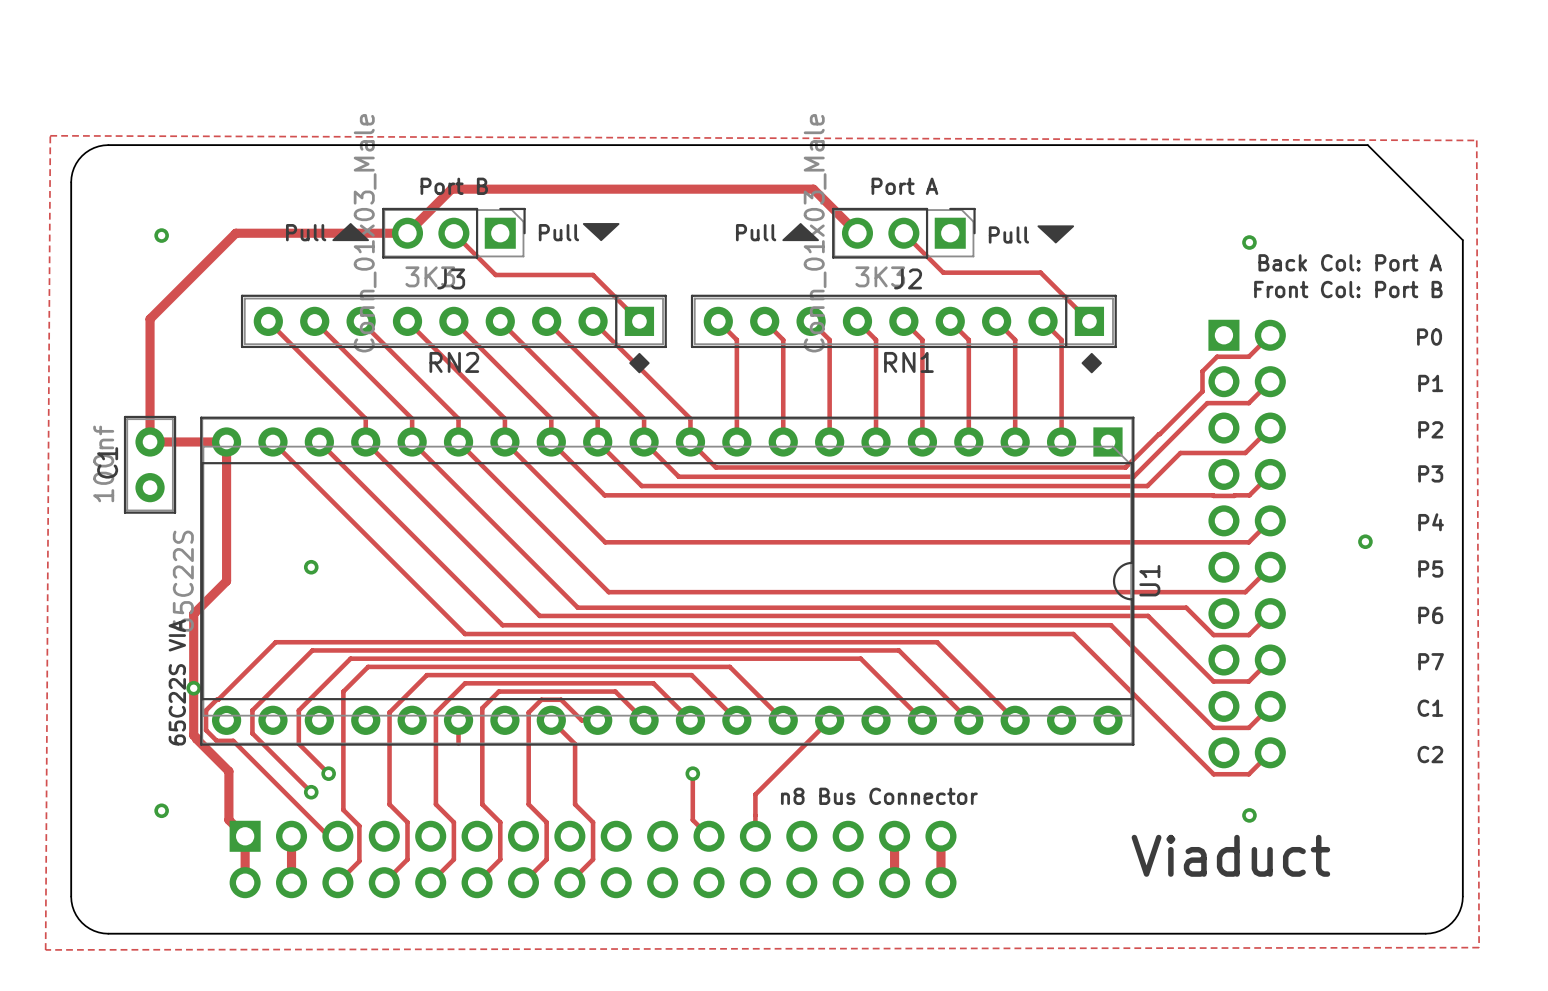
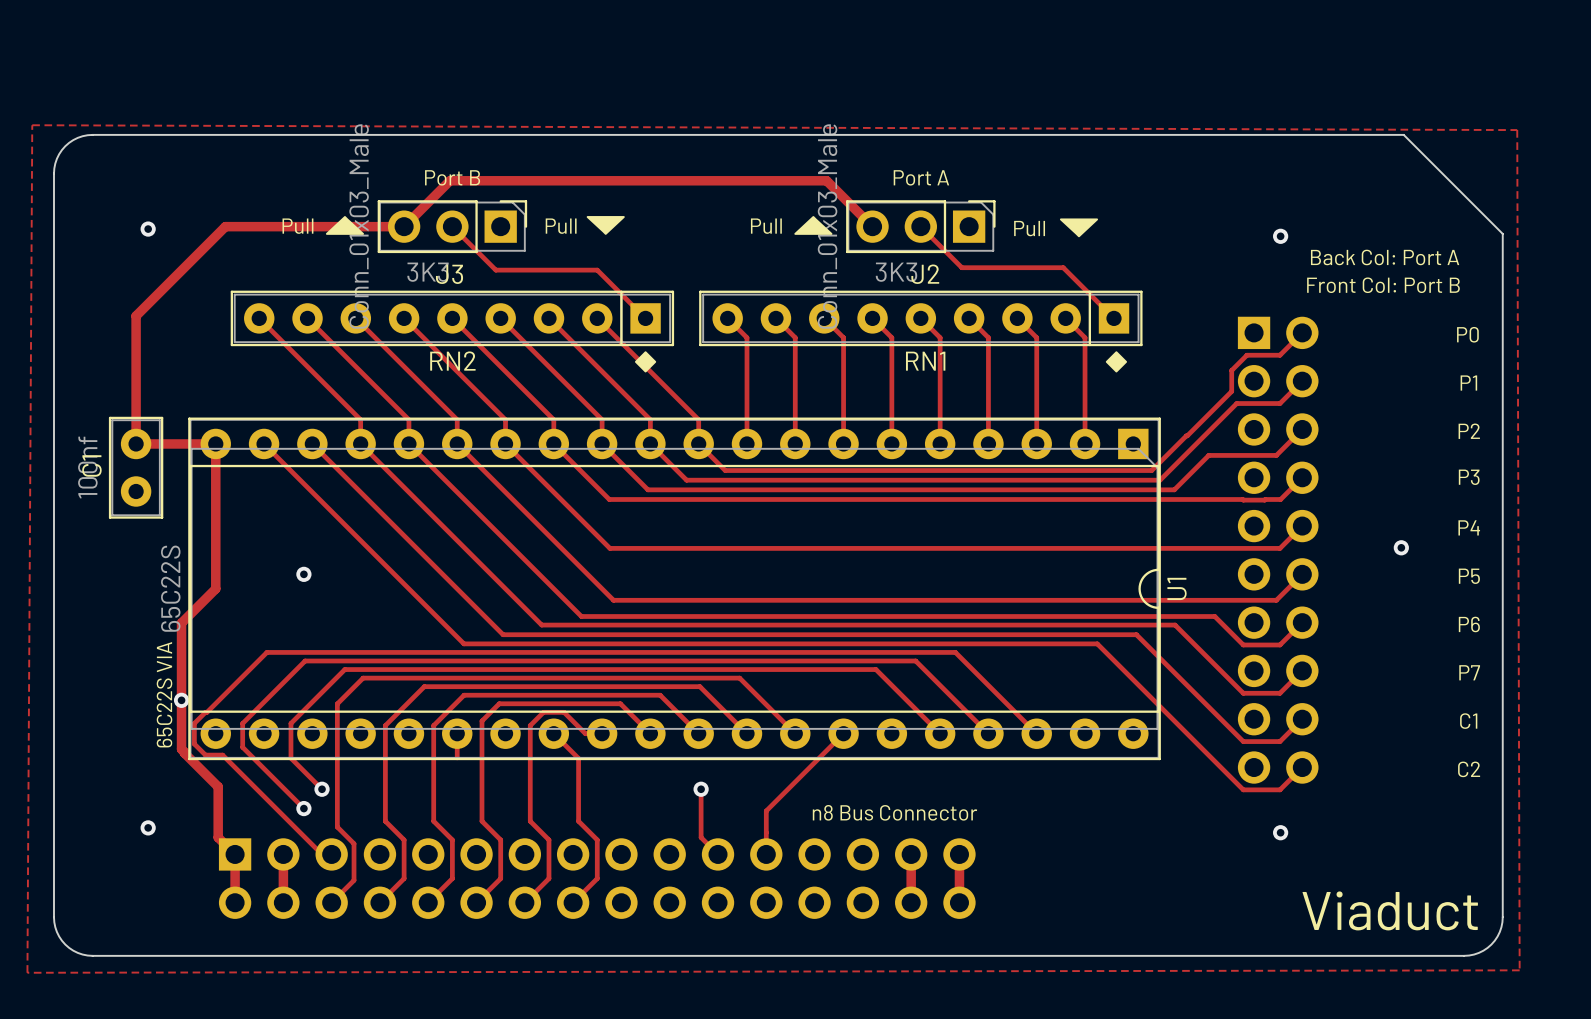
text position: Viaduct (1230, 855) -> Viaduct (1390, 910)

